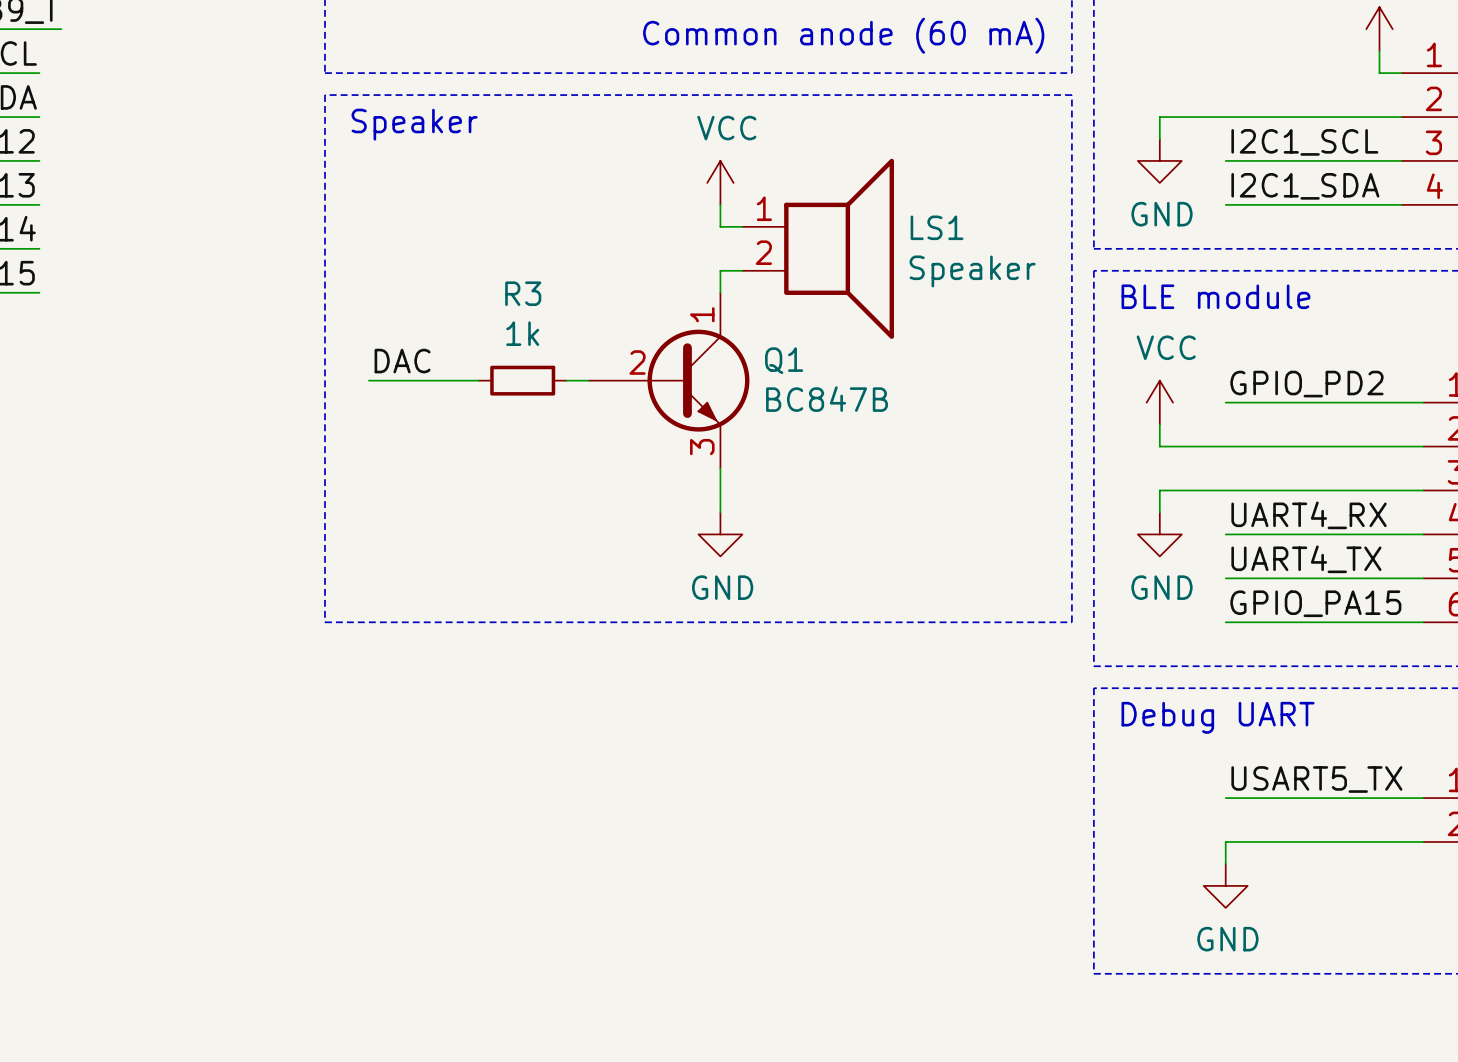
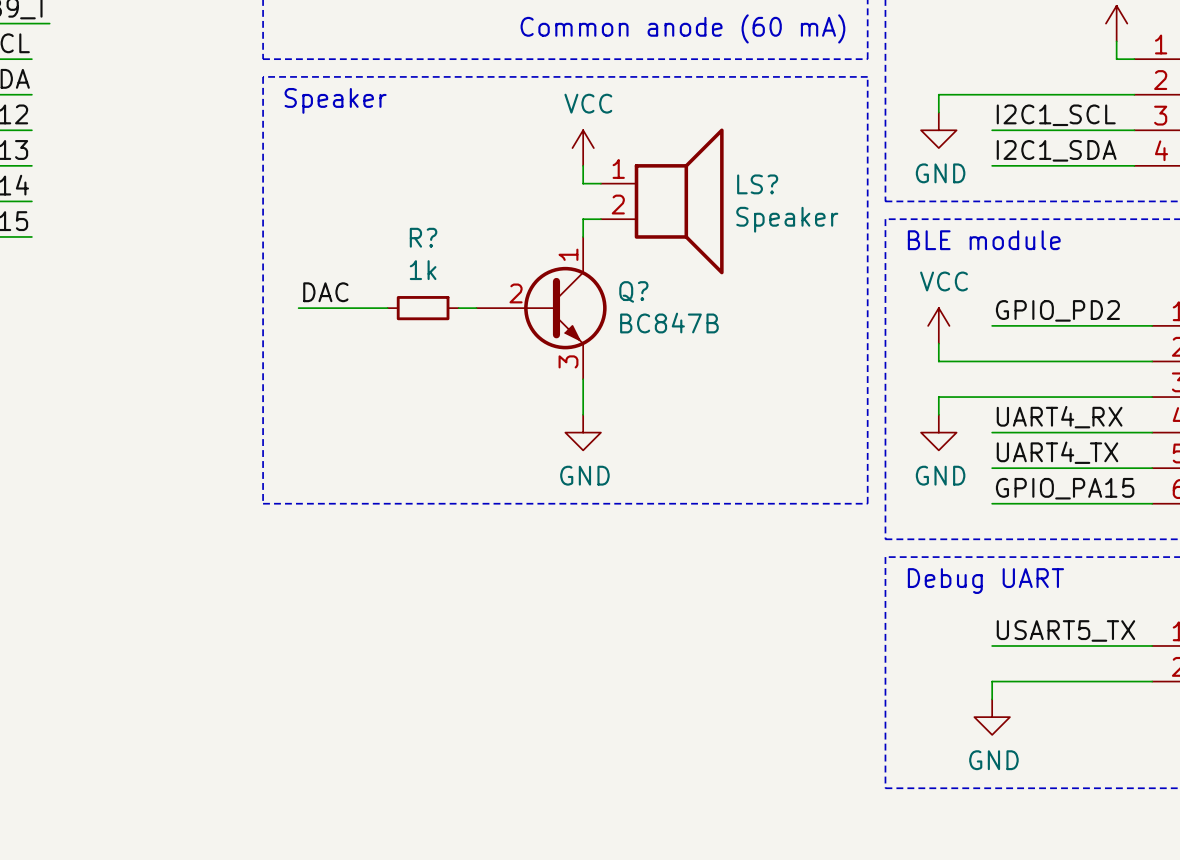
LS1 name: LS1 (937, 227) -> LS? (757, 184)
R3 name: R3 (523, 293) -> R? (423, 237)
Q1 name: Q1 (784, 360) -> Q? (633, 291)

